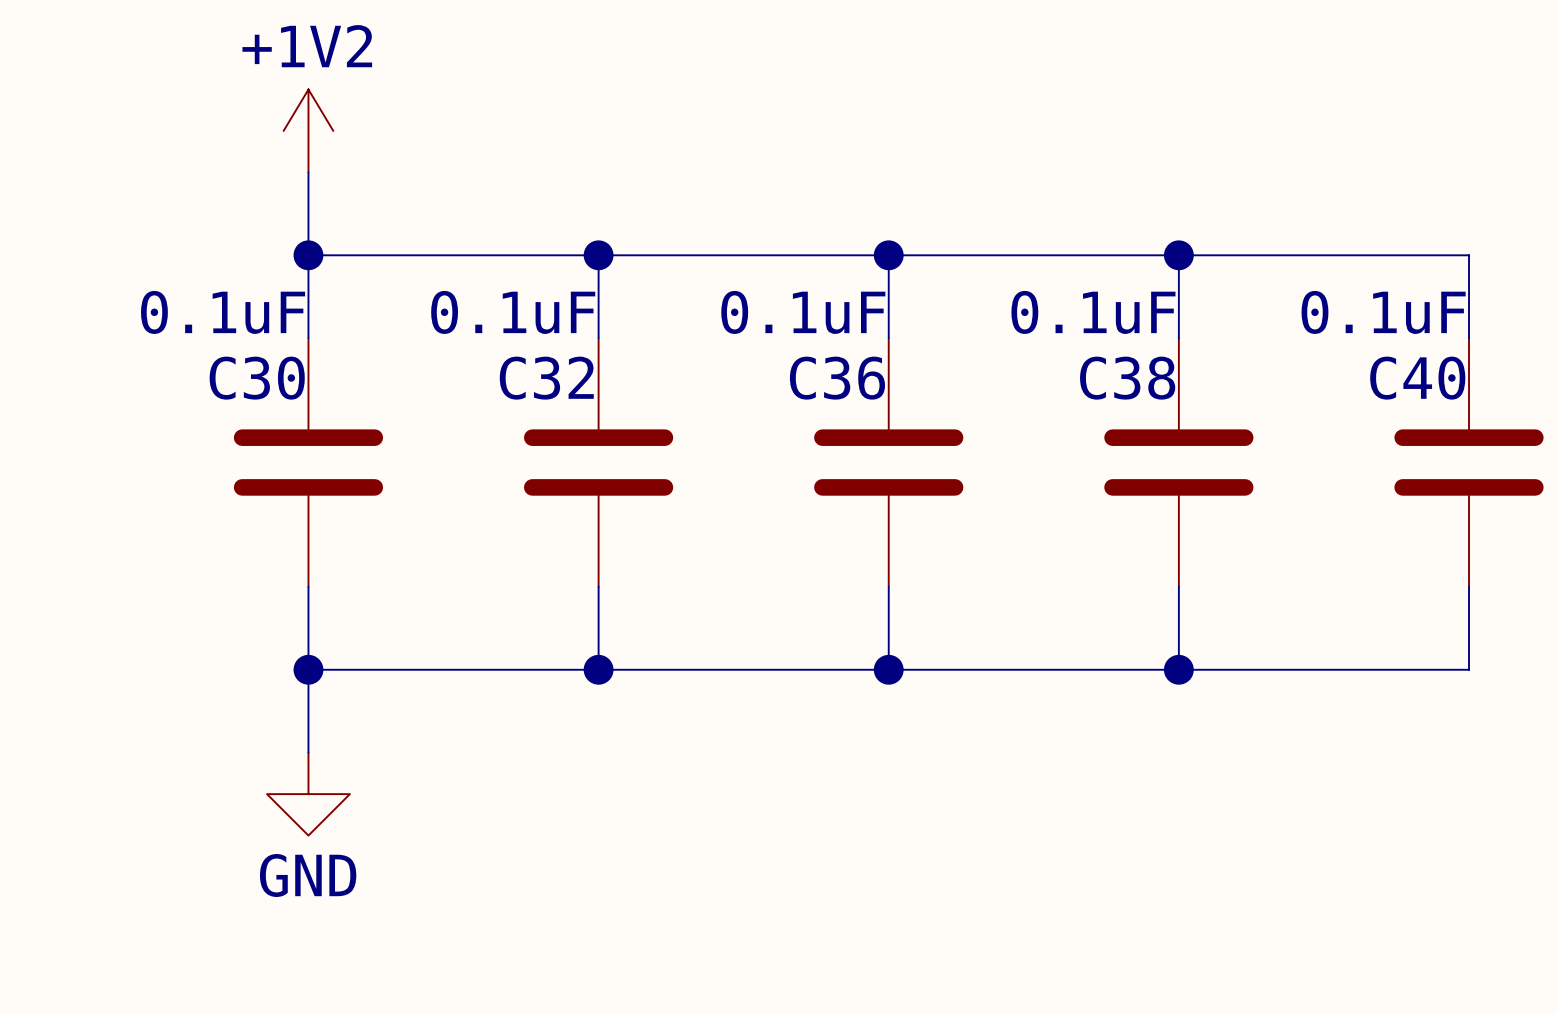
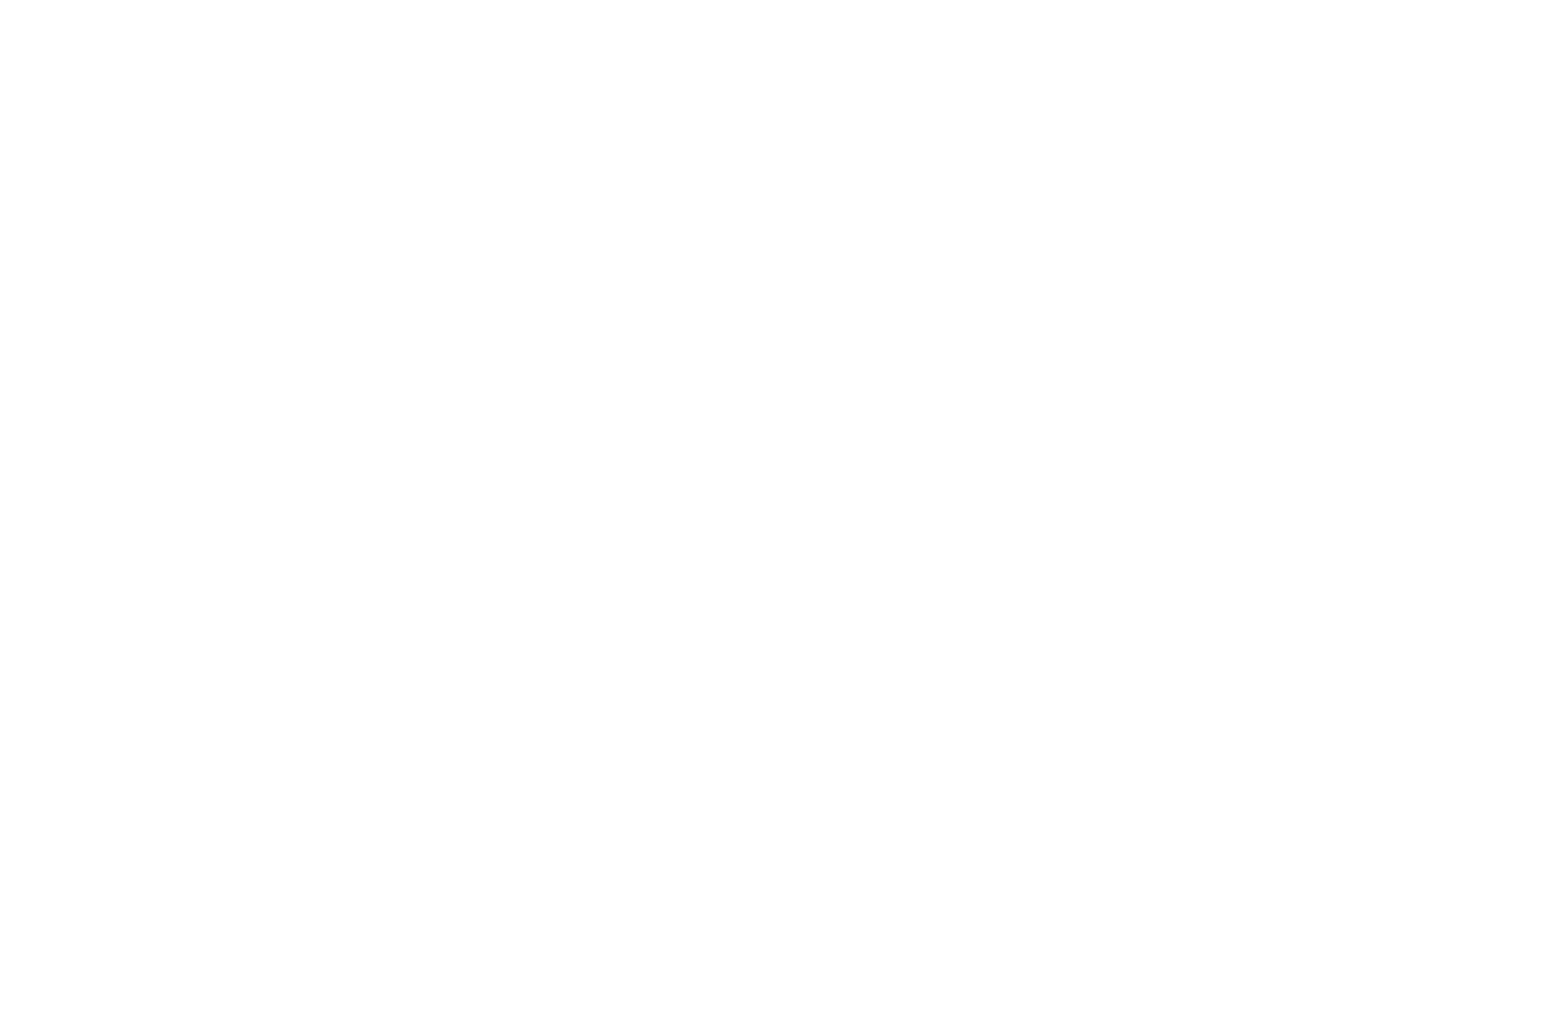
power symbol: +1V2 (308, 130) -> none
wire: (308, 172) (308, 338) -> none
wire: (308, 255) (1469, 255) (1469, 338) -> none
junction: (308, 255) -> none
wire: (598, 255) (598, 338) -> none
junction: (598, 255) -> none
wire: (888, 255) (888, 338) -> none
junction: (888, 255) -> none
wire: (1178, 255) (1178, 338) -> none
junction: (1178, 255) -> none
C30: 0.1uF (308, 462) -> none
C32: 0.1uF (598, 462) -> none
C36: 0.1uF (888, 462) -> none
C38: 0.1uF (1178, 462) -> none
C40: 0.1uF (1469, 462) -> none
wire: (308, 586) (308, 752) -> none
wire: (598, 586) (598, 669) -> none
wire: (888, 586) (888, 669) -> none
wire: (1178, 586) (1178, 669) -> none
wire: (1469, 586) (1469, 669) (308, 669) -> none
junction: (308, 669) -> none
junction: (598, 669) -> none
junction: (888, 669) -> none
junction: (1178, 669) -> none
power symbol: GND (308, 794) -> none

